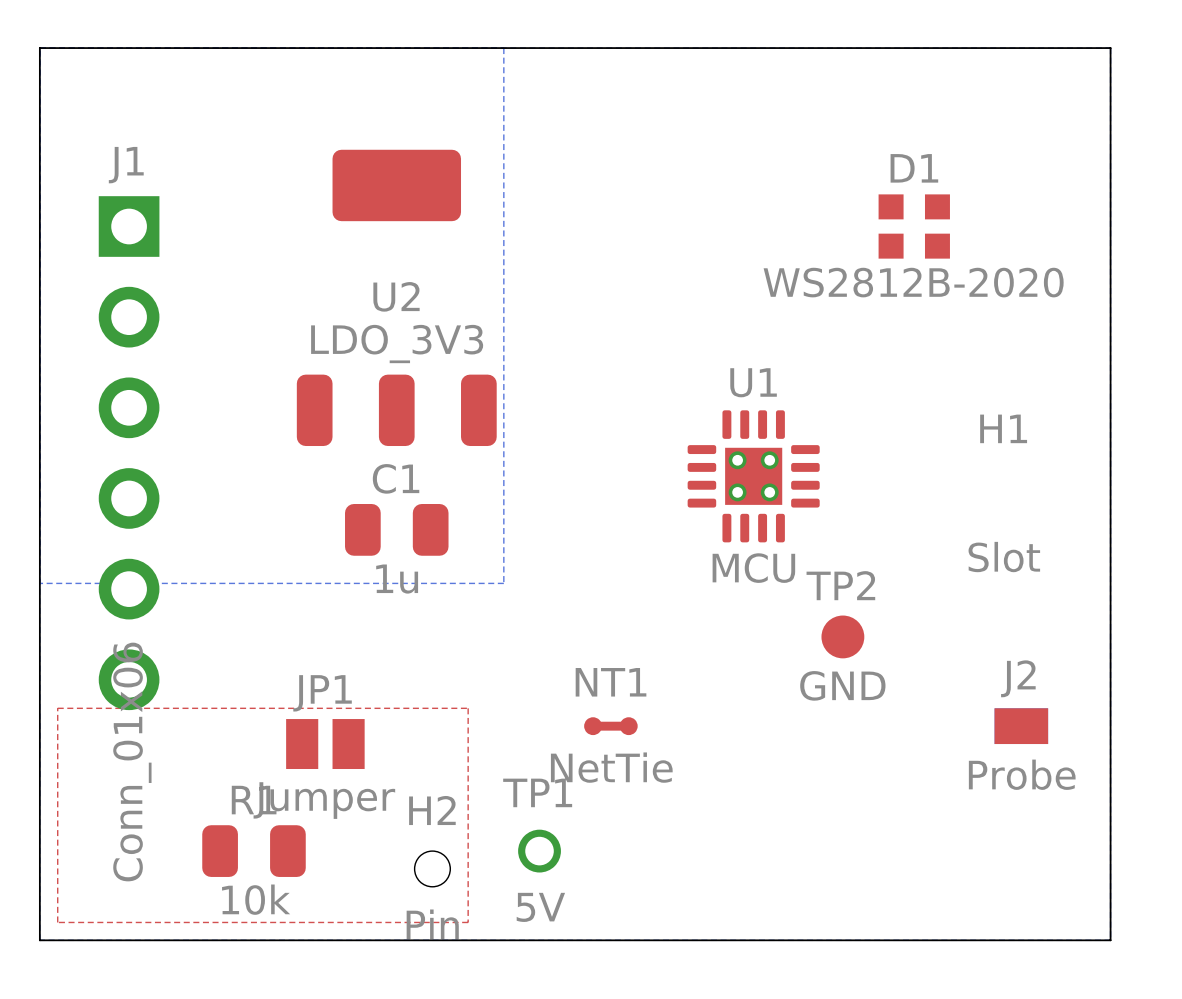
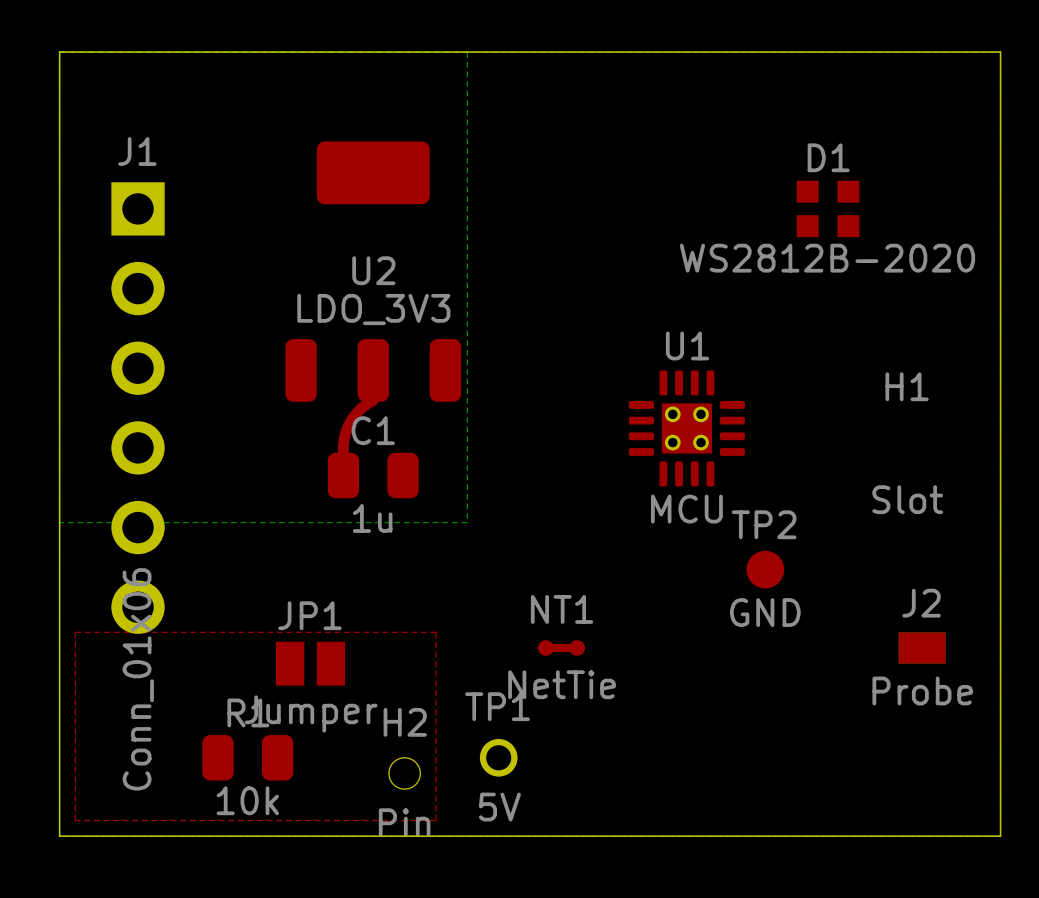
top track: none -> (373, 400) (357, 411) (350, 422) (343, 440) (343, 453)

